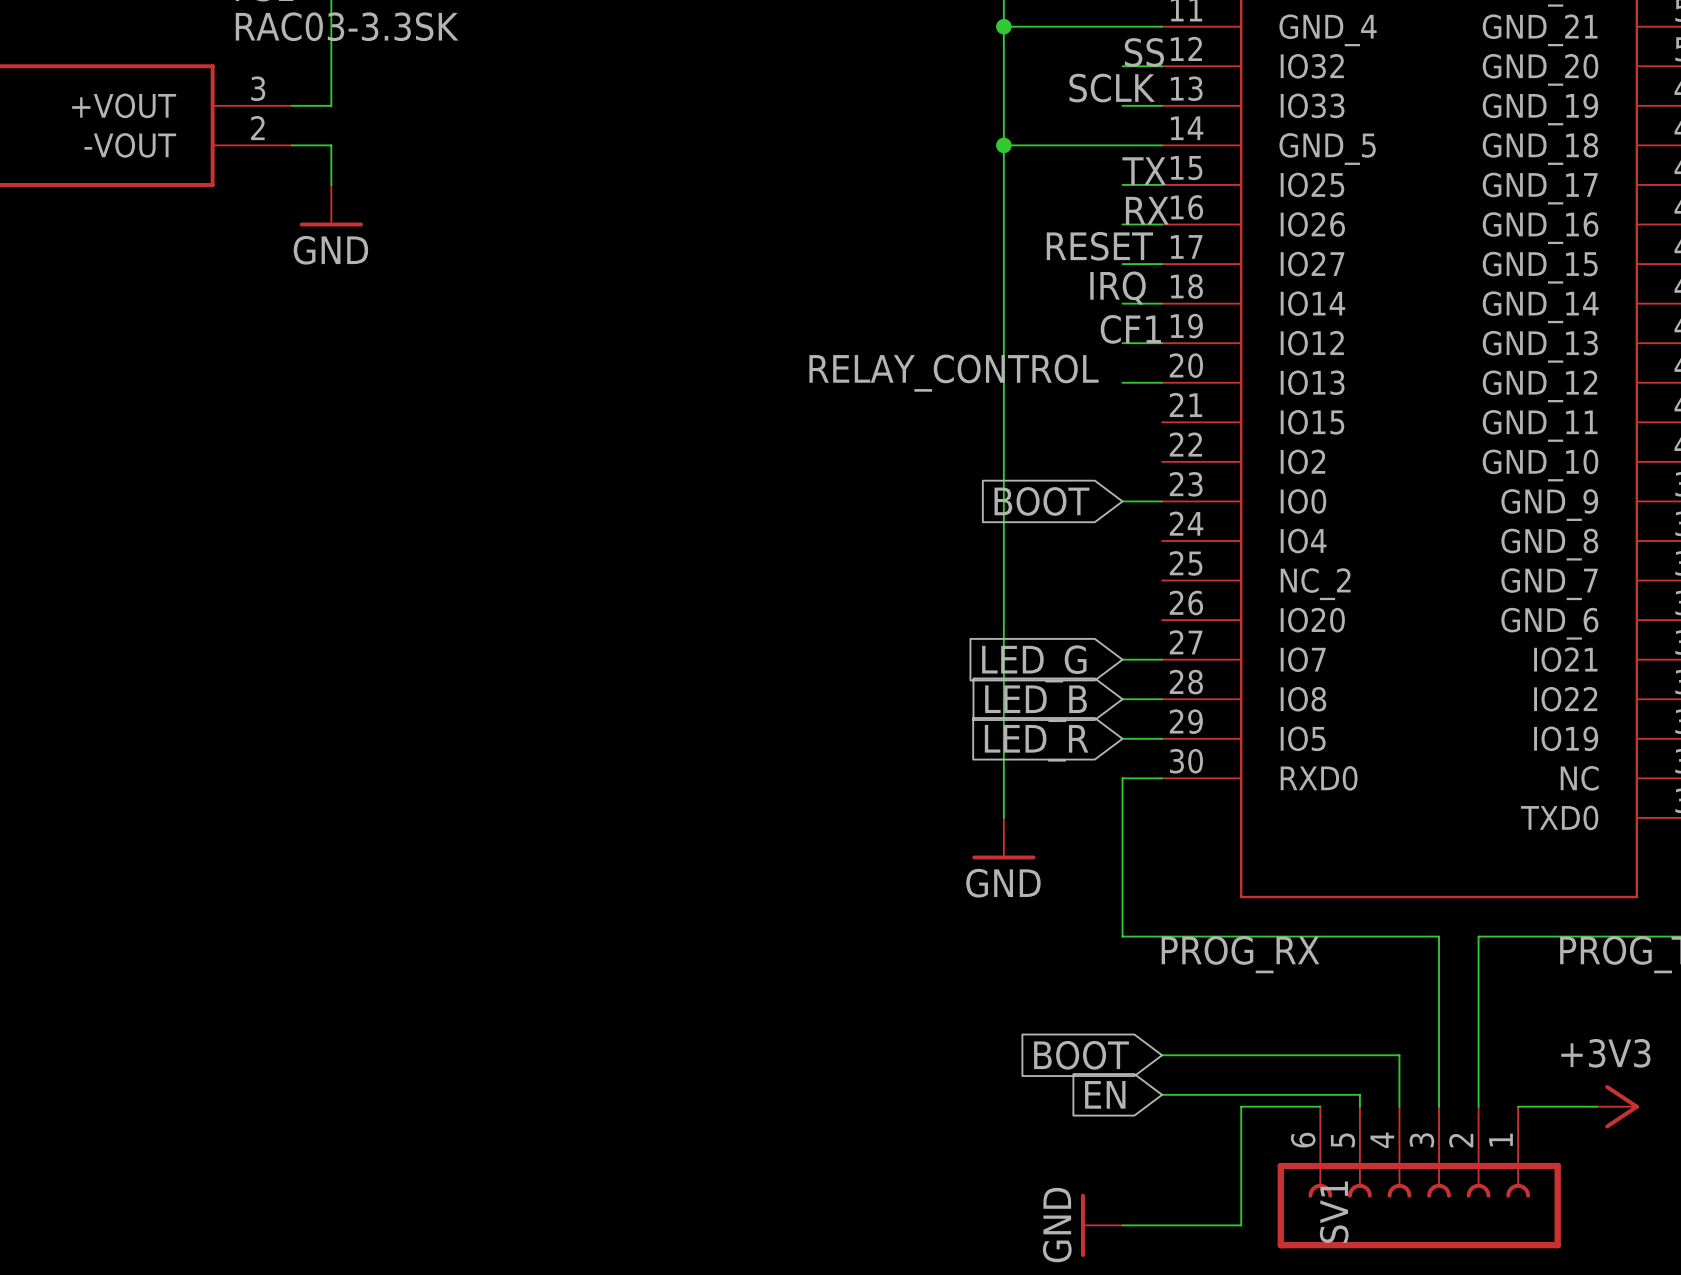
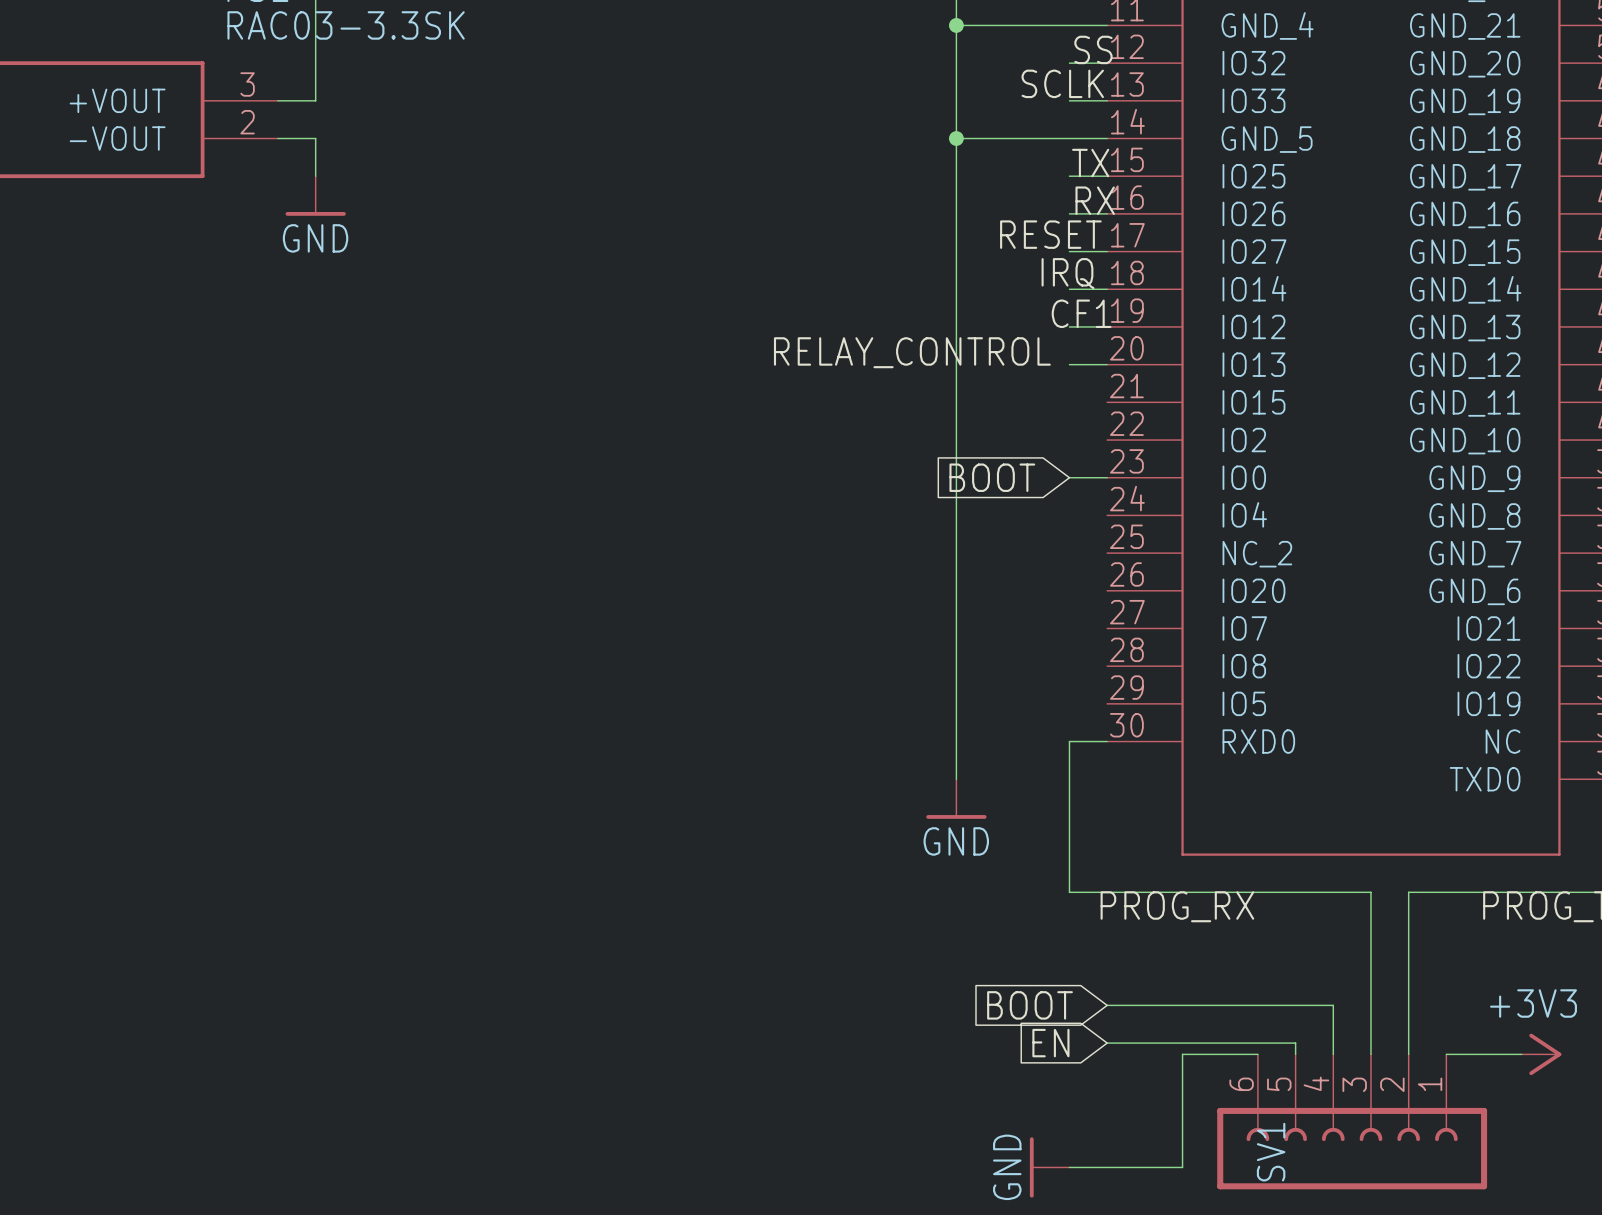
wire: (1122, 659) (1162, 659) -> none
global label: LED_G (1034, 663) -> none
wire: (1122, 699) (1162, 699) -> none
global label: LED_B (1036, 703) -> none
wire: (1122, 738) (1162, 738) -> none
global label: LED_R (1036, 743) -> none

